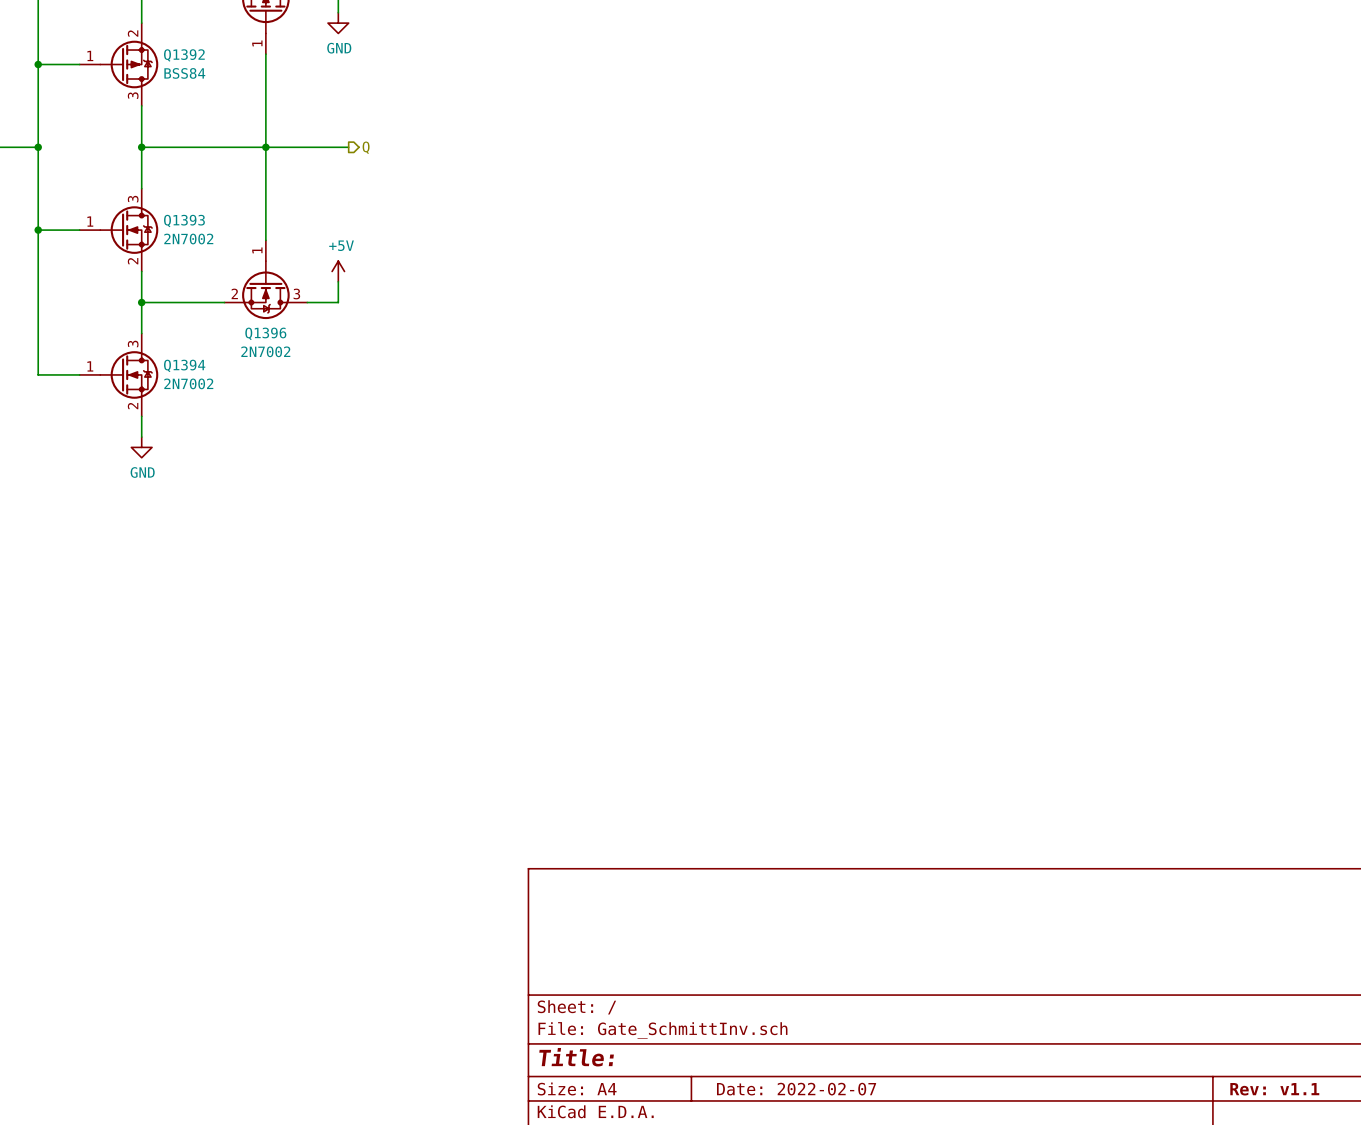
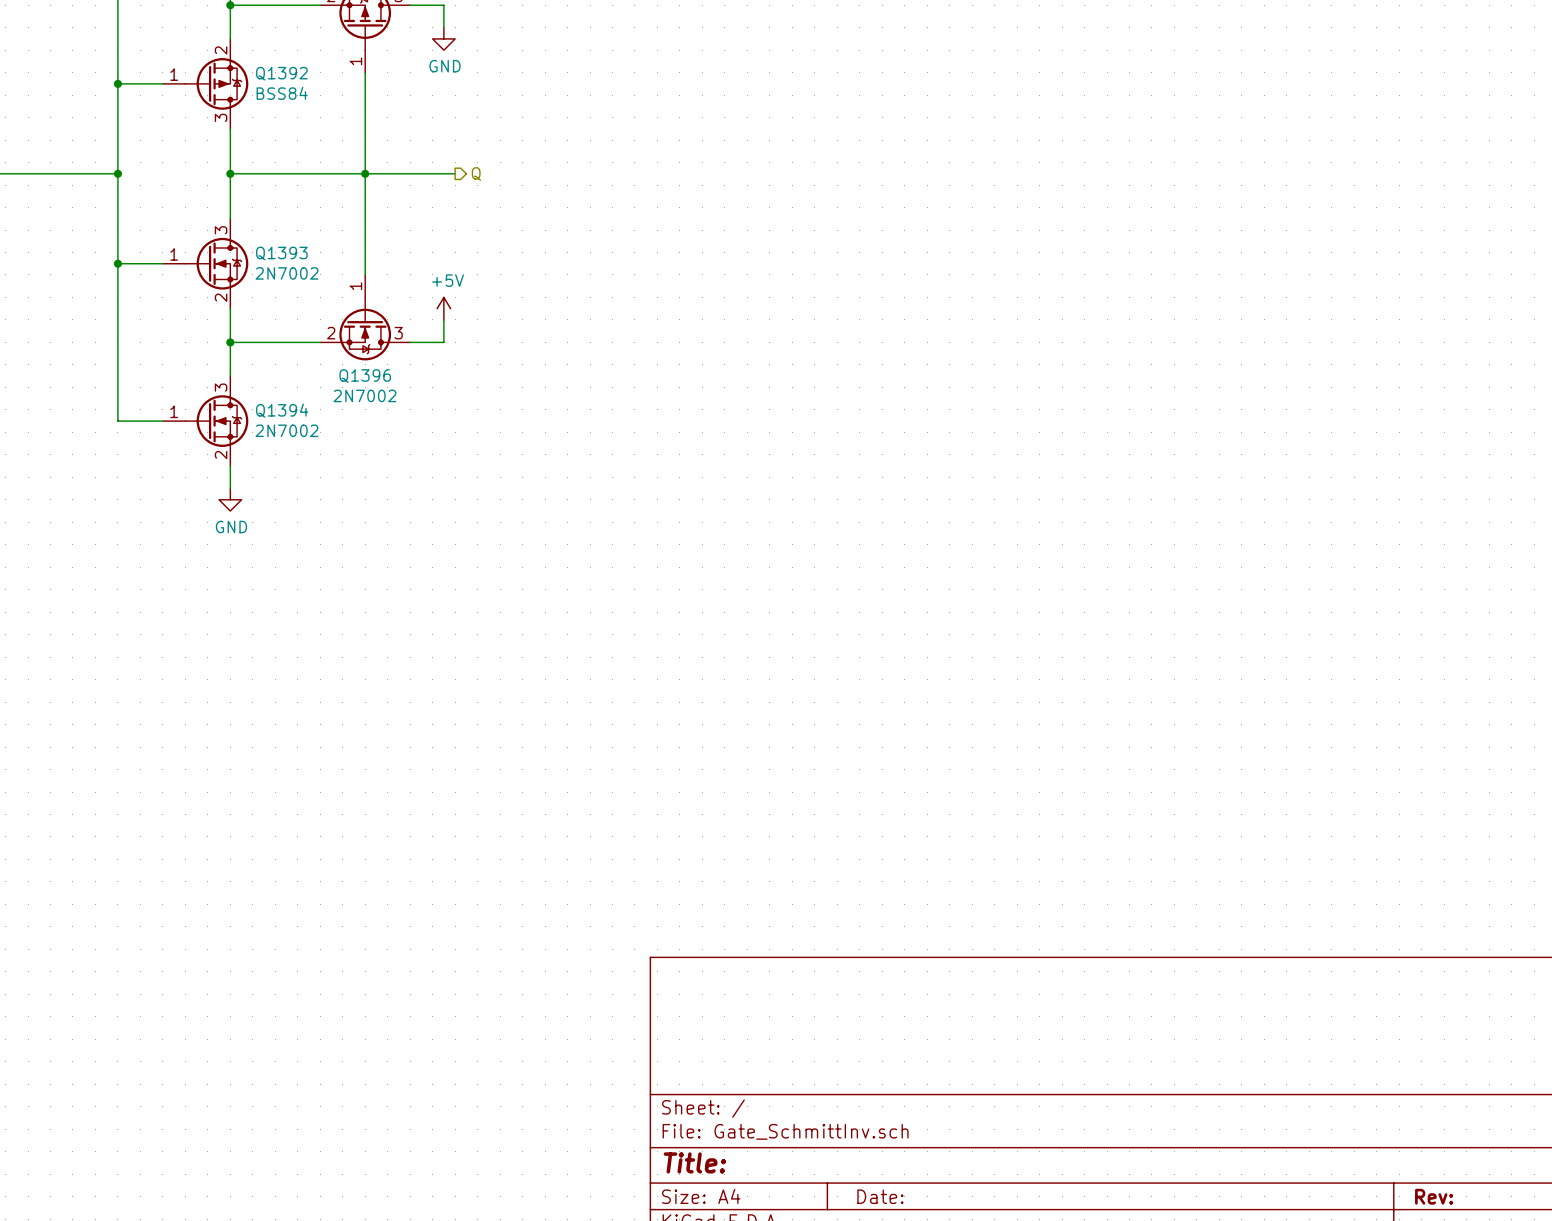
title block: Date: 2022-02-07 (796, 1089) -> Date: (880, 1196)
title block: Rev: v1.1 (1274, 1089) -> Rev: (1434, 1196)

